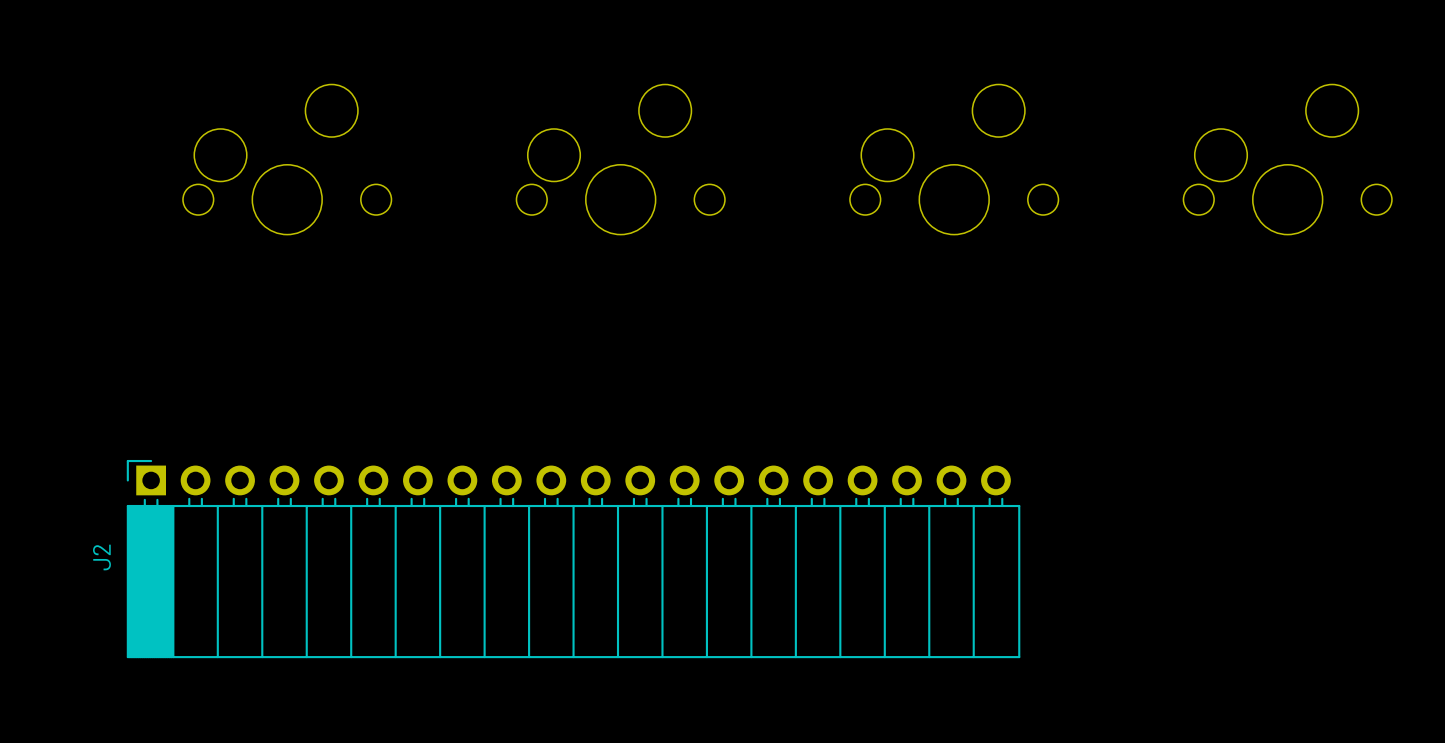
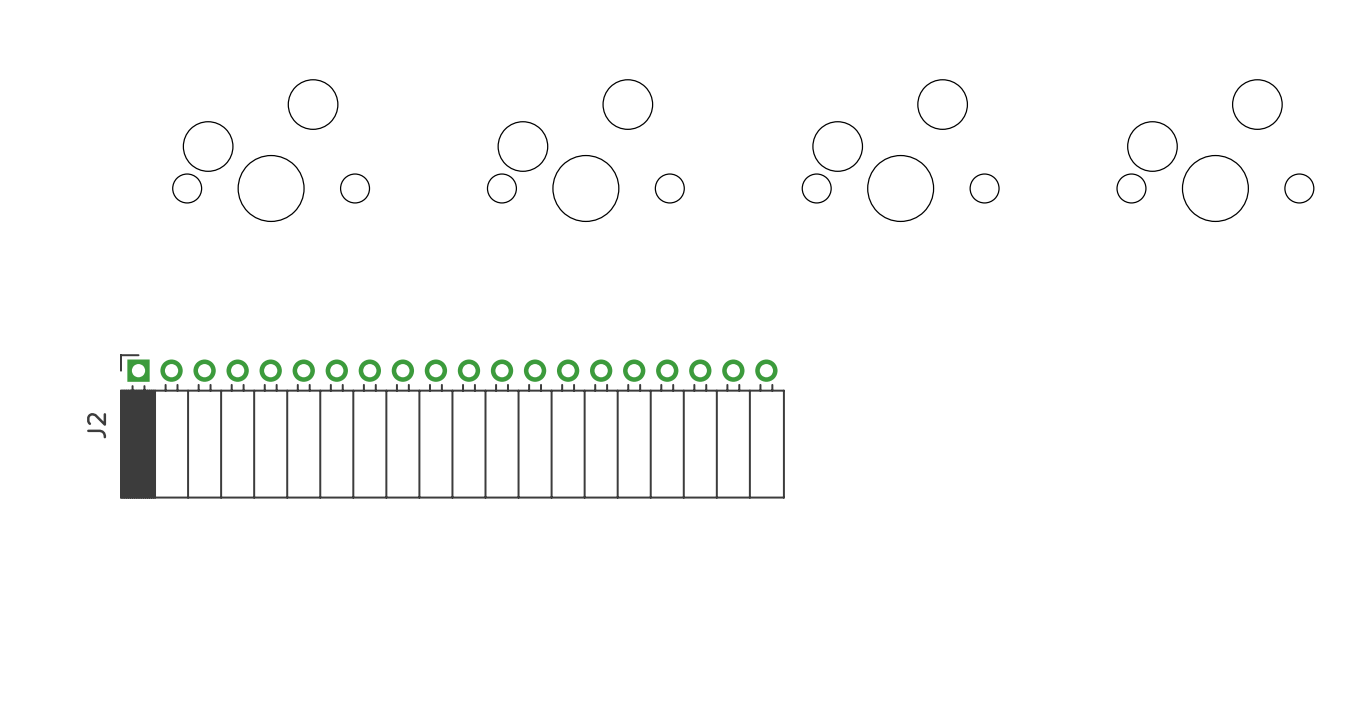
J2 footprint: [126, 459, 1021, 659] -> [120, 354, 785, 499]
J2 name position: J2 (101, 557) -> J2 (96, 425)

